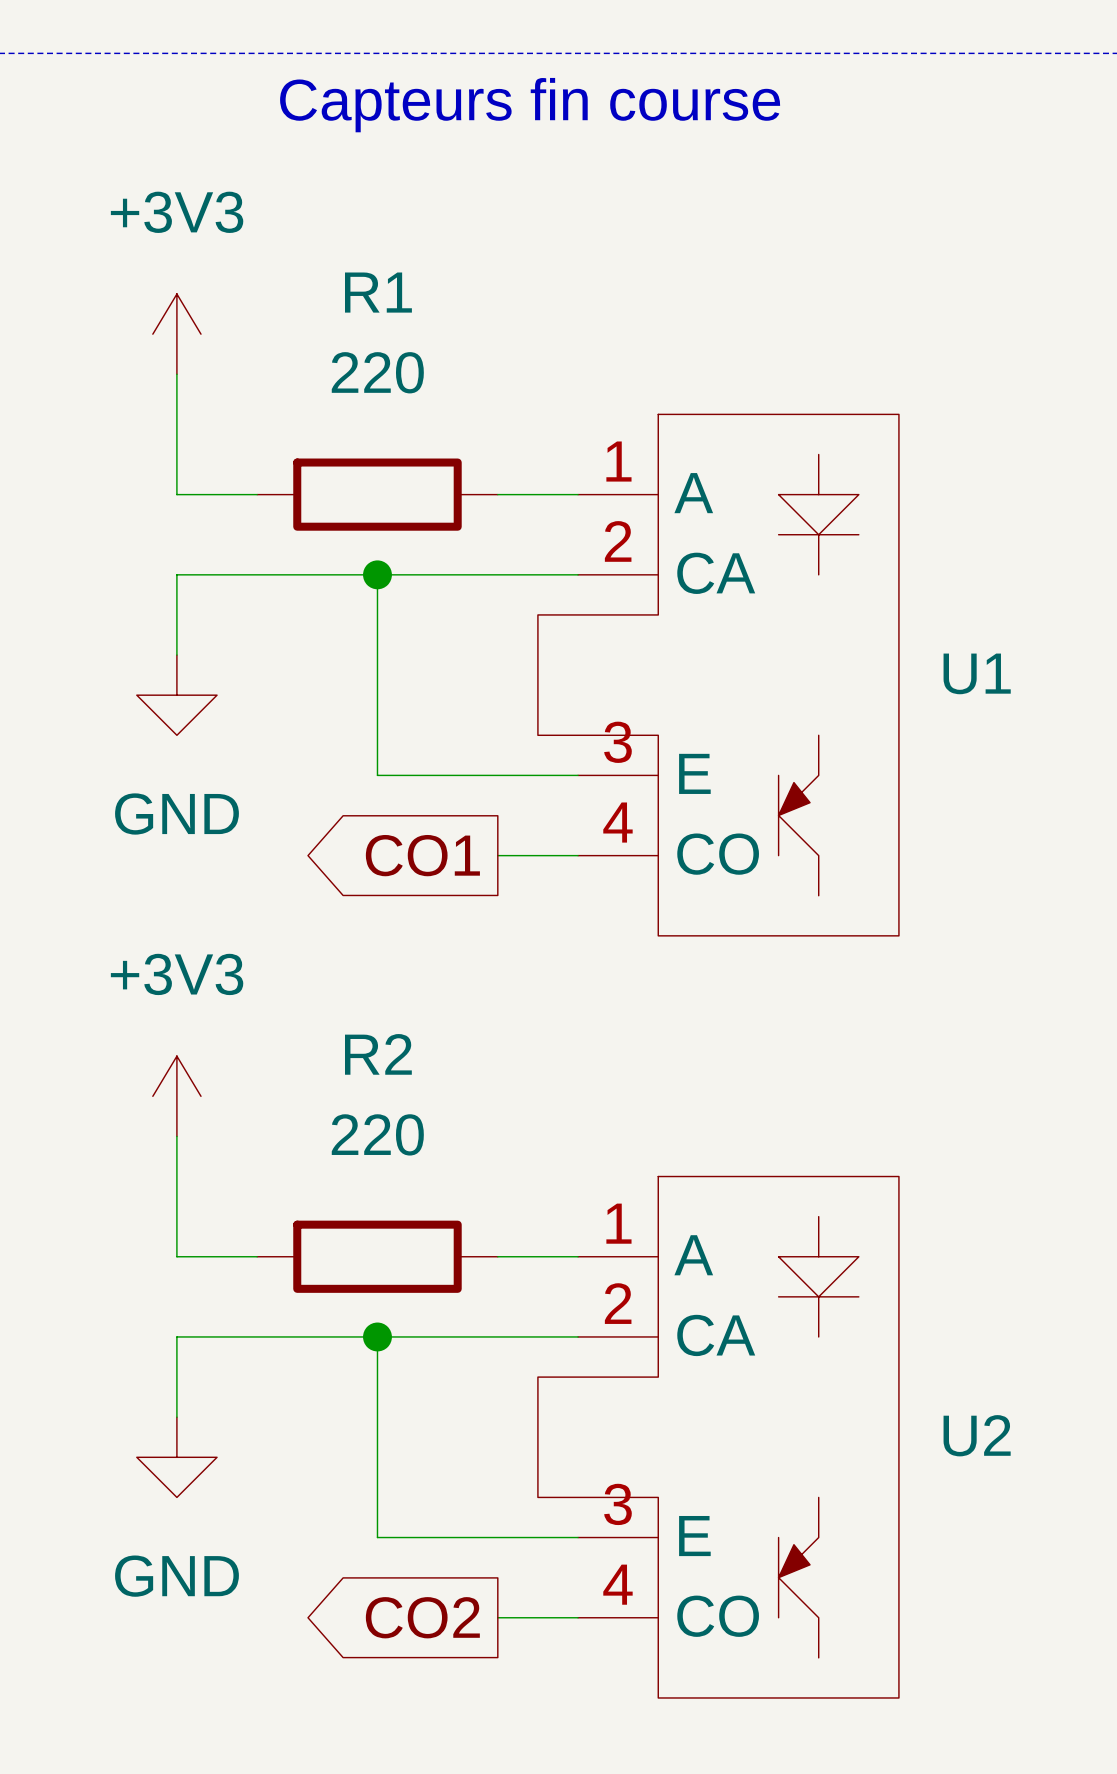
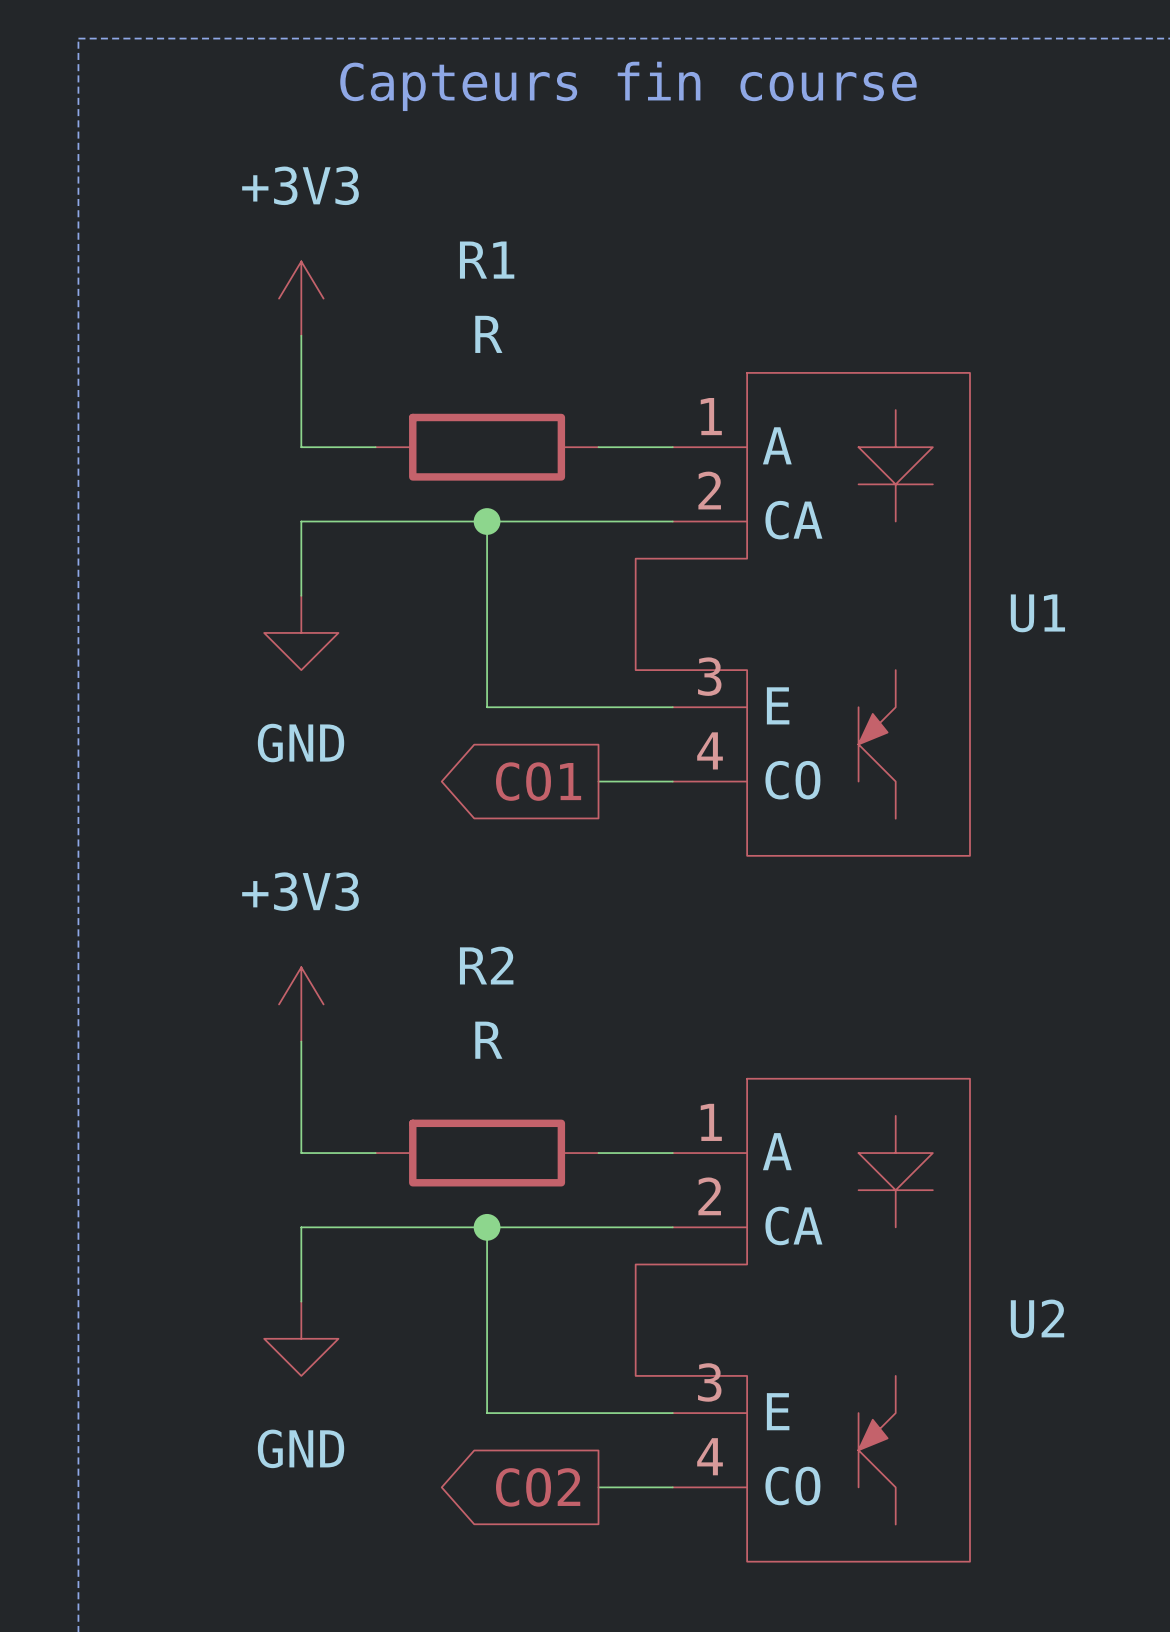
R1 value: 220 (377, 372) -> R (488, 334)
R2 value: 220 (377, 1134) -> R (488, 1040)

